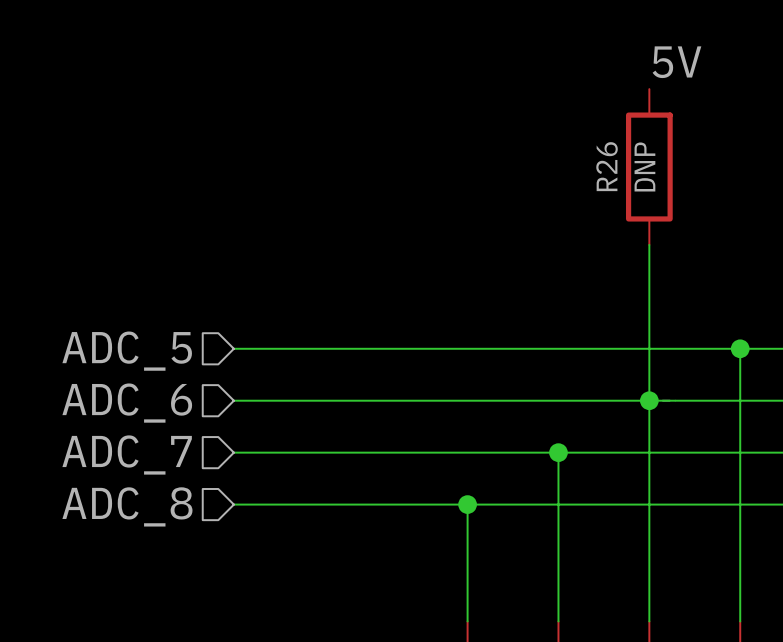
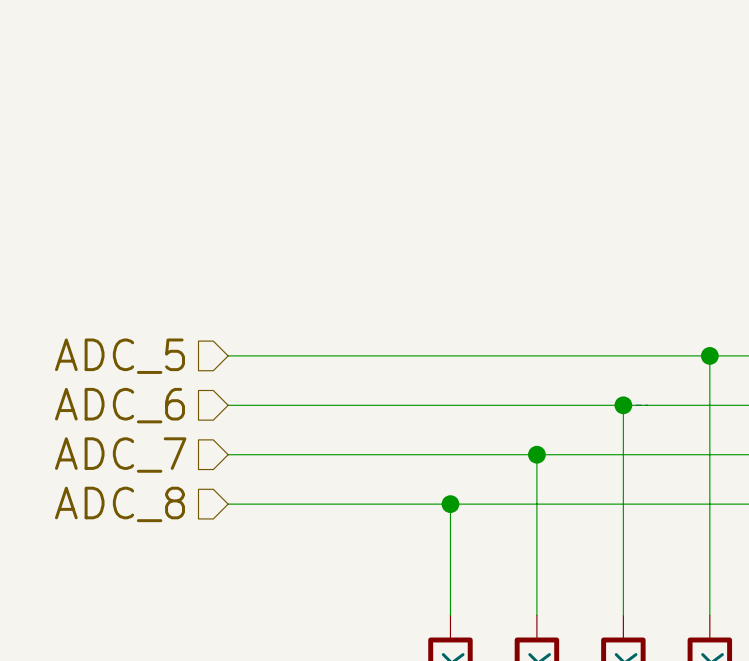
label: 5V (676, 62) -> none
R26: DNP (649, 167) -> none
wire: (649, 244) (649, 400) -> none

